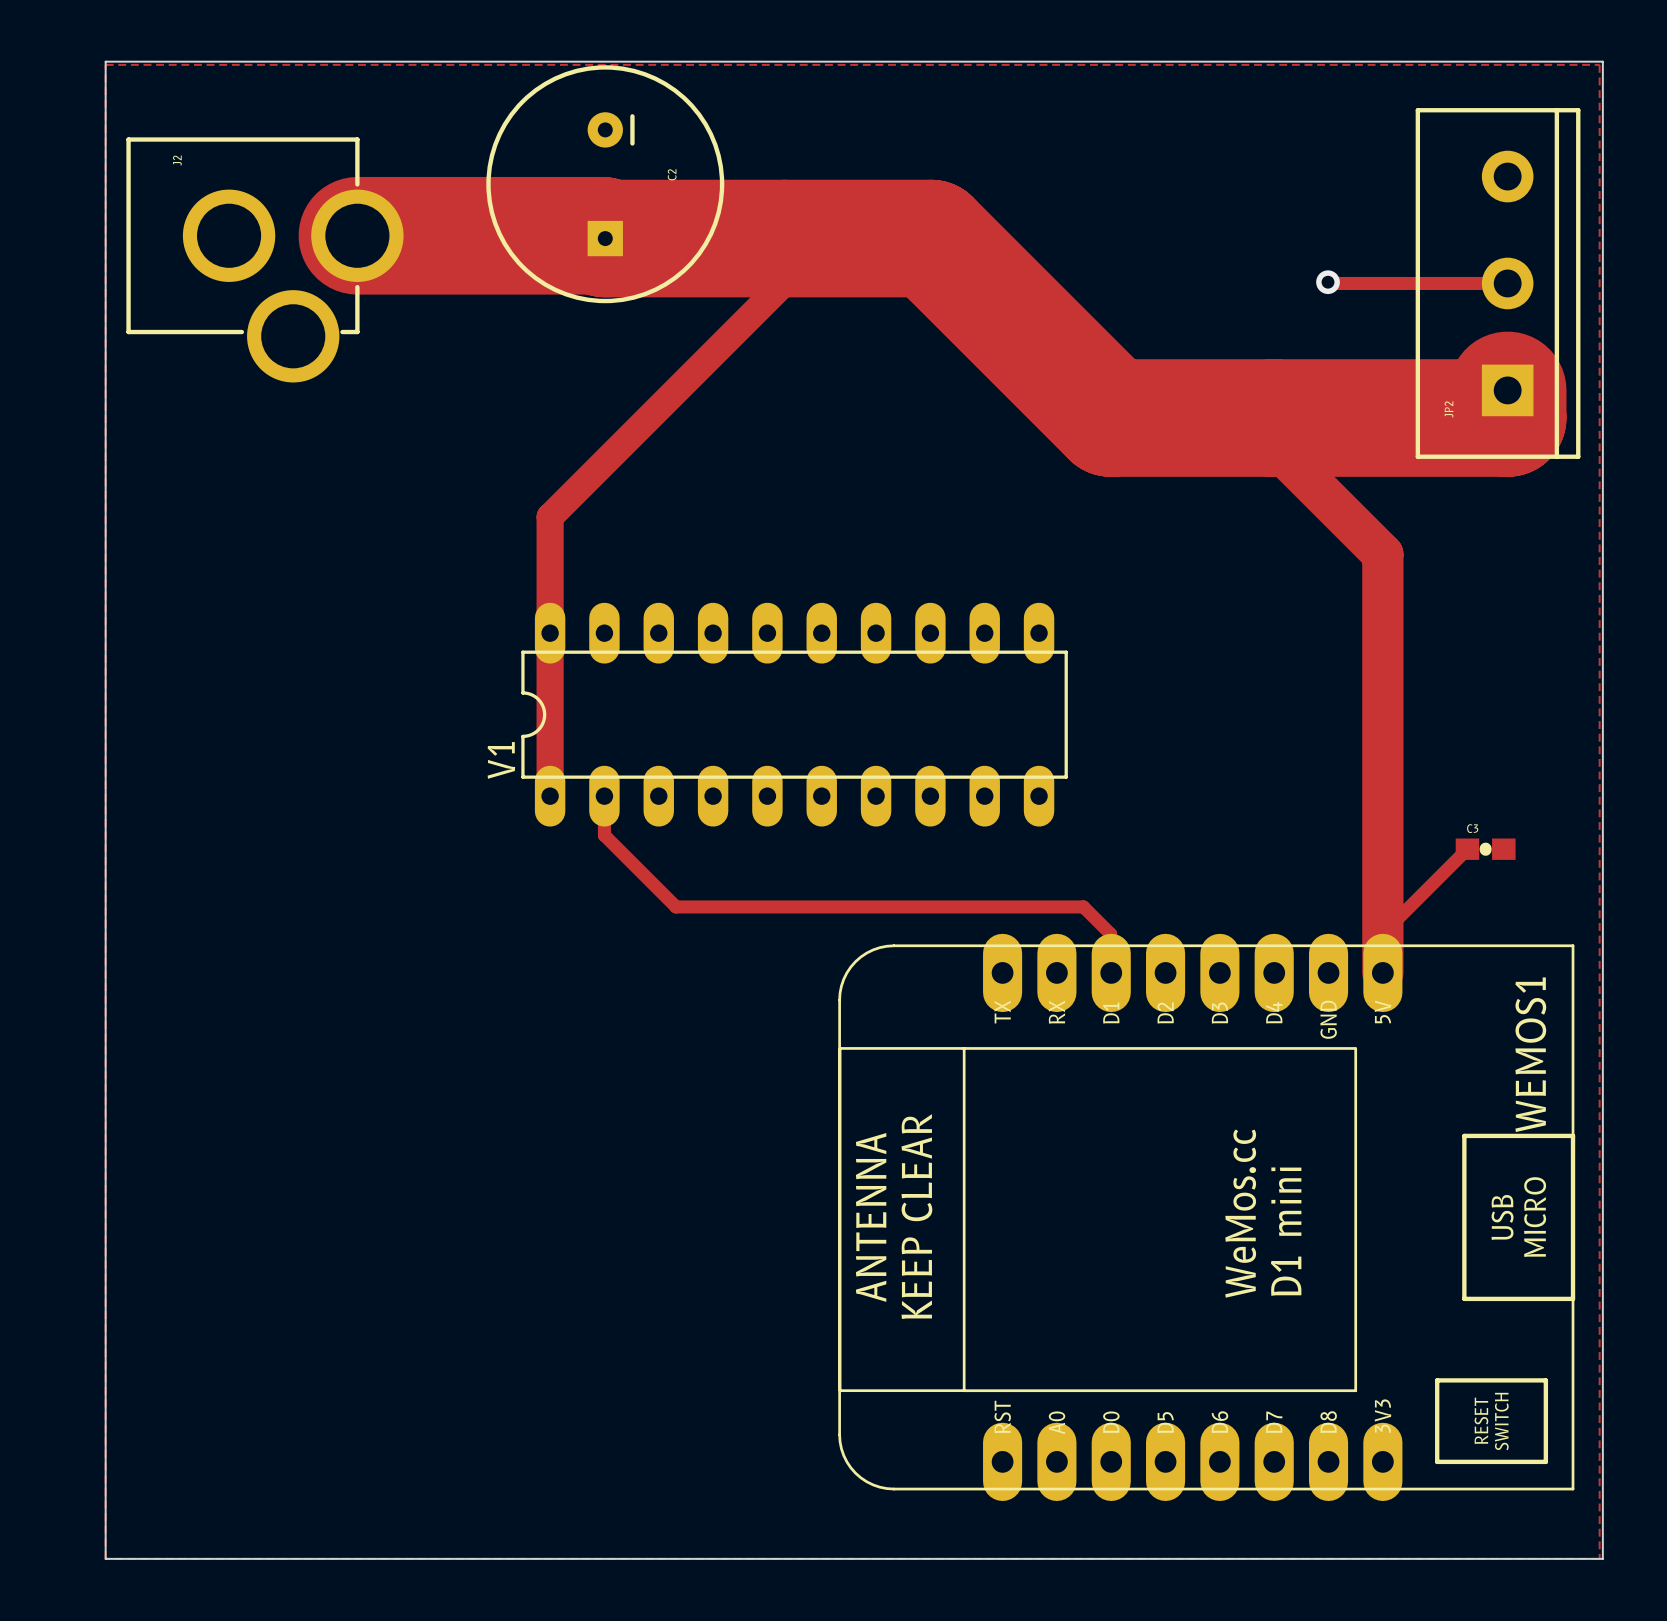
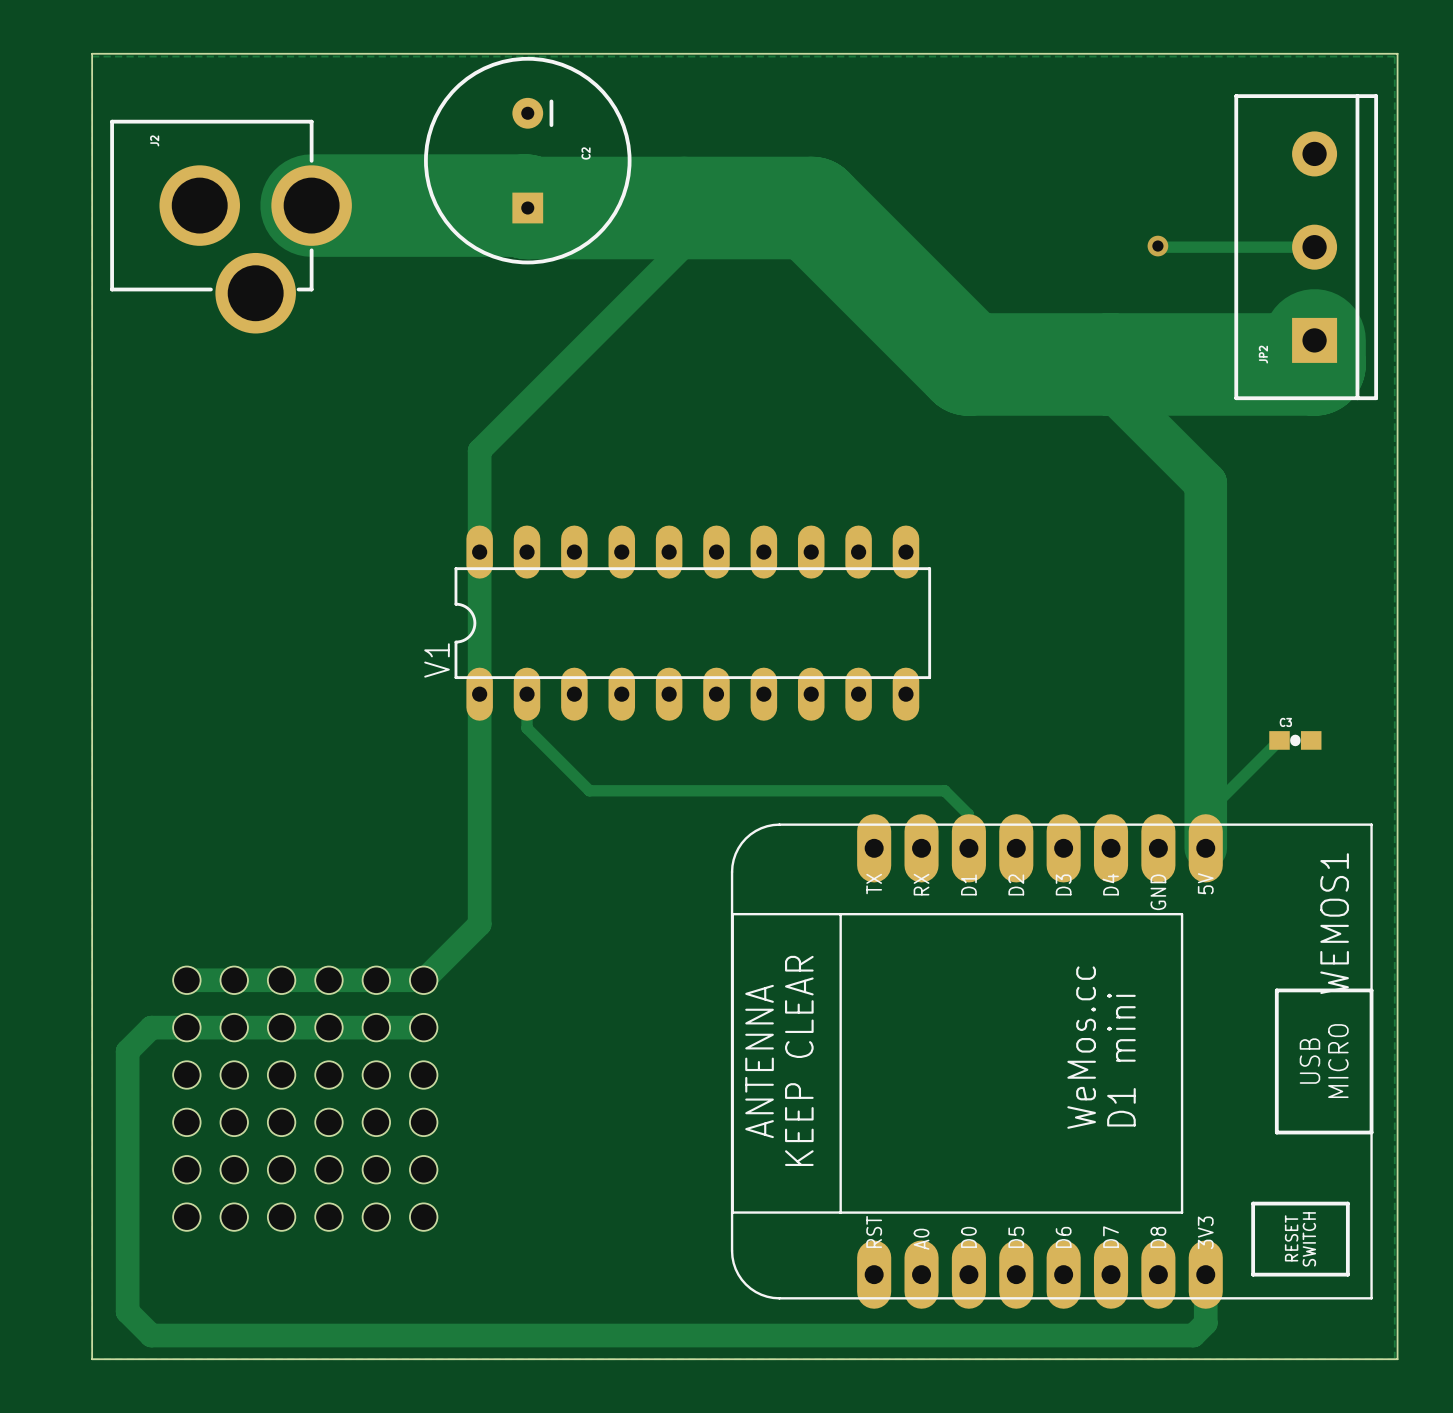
track width: thin (1273, 445) (1382, 554) (1382, 972) -> thick (1110, 388) (1205, 483) (1205, 848)
track: none -> (479, 694) (479, 924) (423, 980) (186, 980)
part: none -> (305, 980)
part: none -> (305, 1027)
track: none -> (423, 1027) (151, 1027) (127, 1051) (127, 1311) (151, 1335) (1193, 1335) (1205, 1323) (1205, 1274)
part: none -> (305, 1075)
part: none -> (305, 1122)
part: none -> (305, 1169)
part: none -> (305, 1217)

